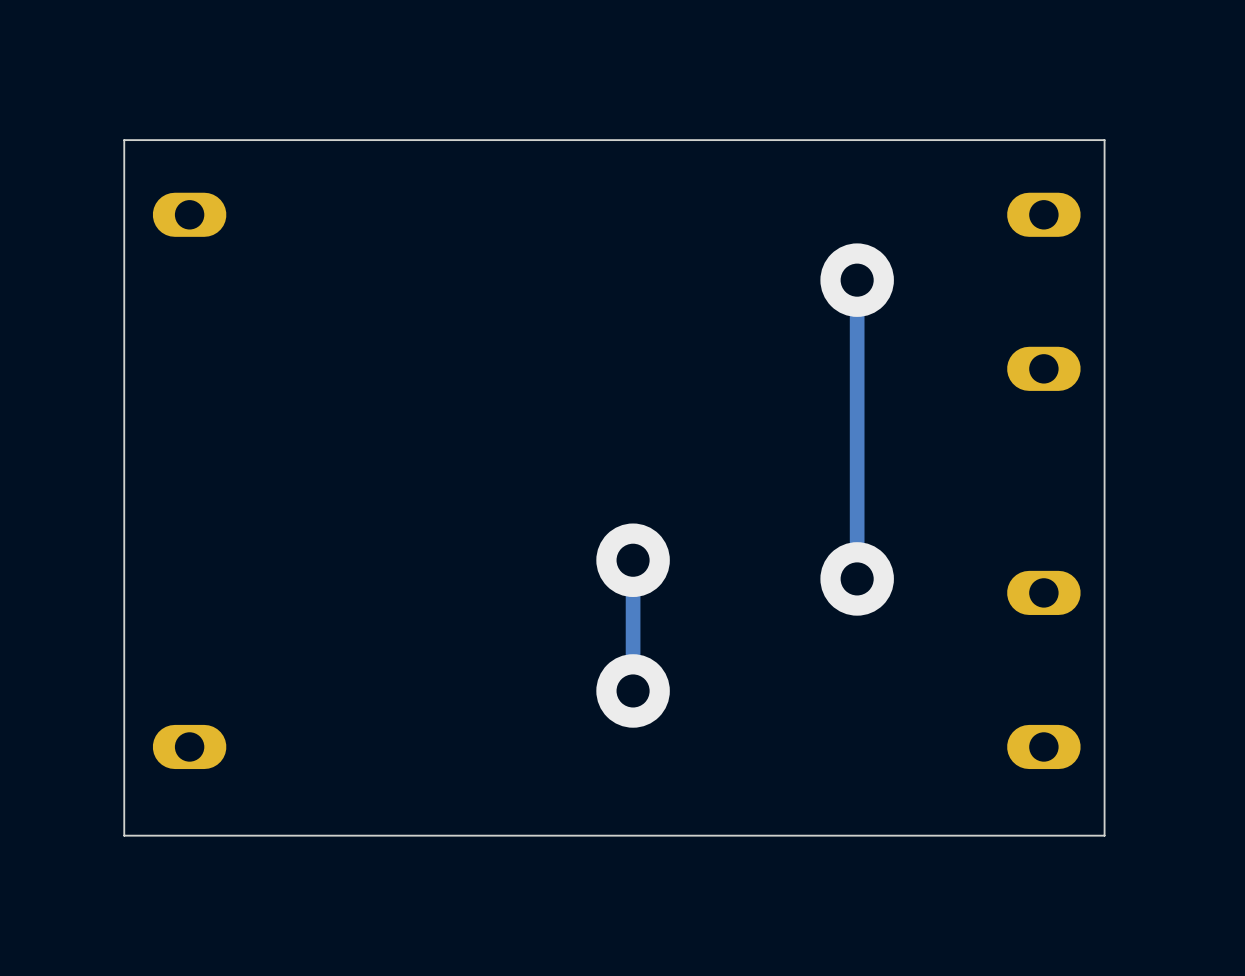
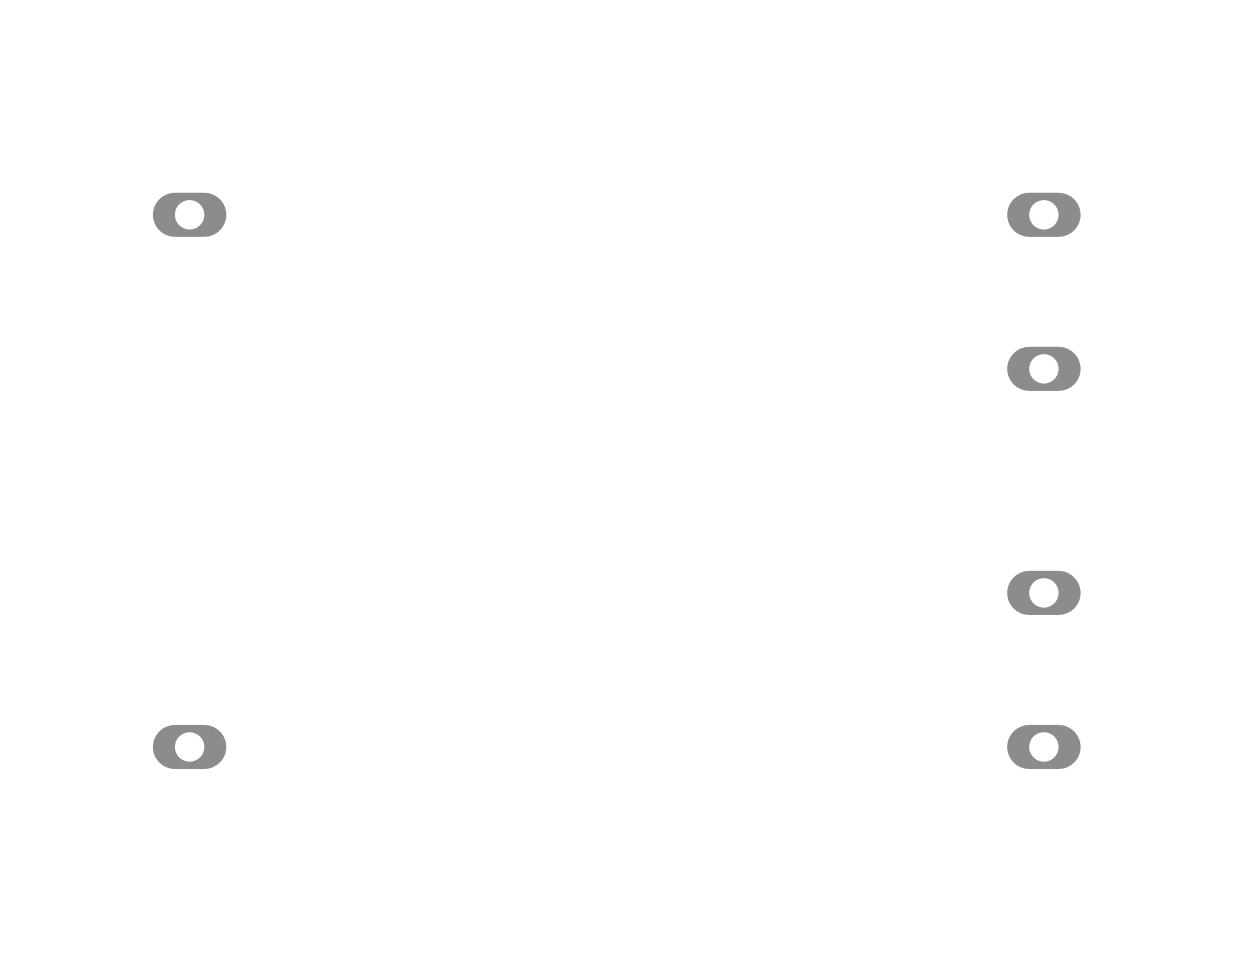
board edge: (1104, 140) (1104, 835) (124, 835) (124, 140) (1104, 140) -> none
track: (857, 280) (857, 578) -> none
via: (857, 280) -> none
track: (633, 560) (633, 690) -> none
via: (633, 560) -> none
via: (857, 578) -> none
via: (633, 690) -> none

